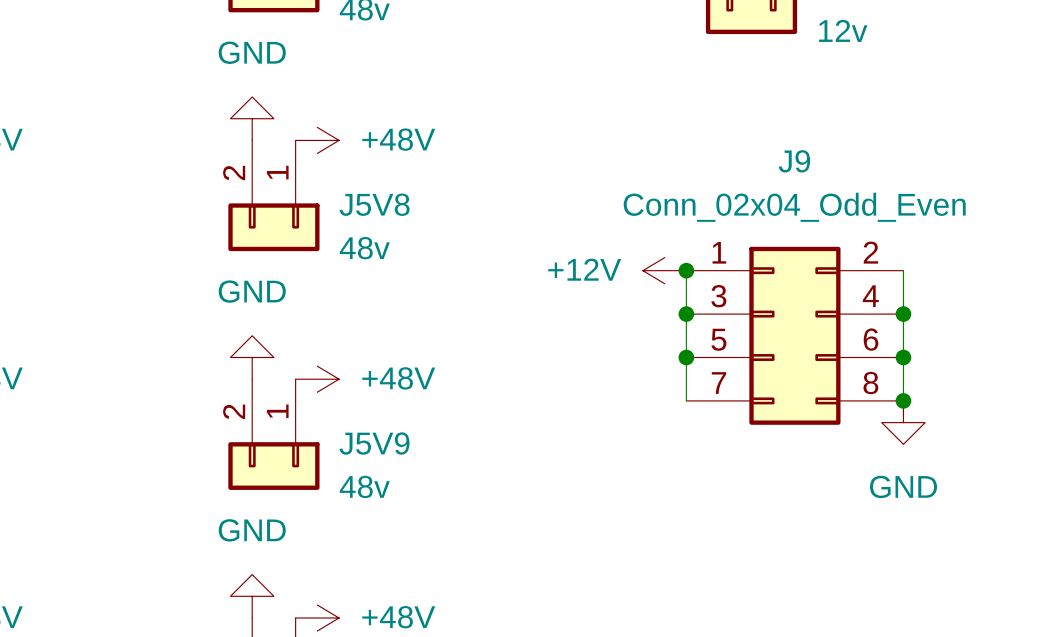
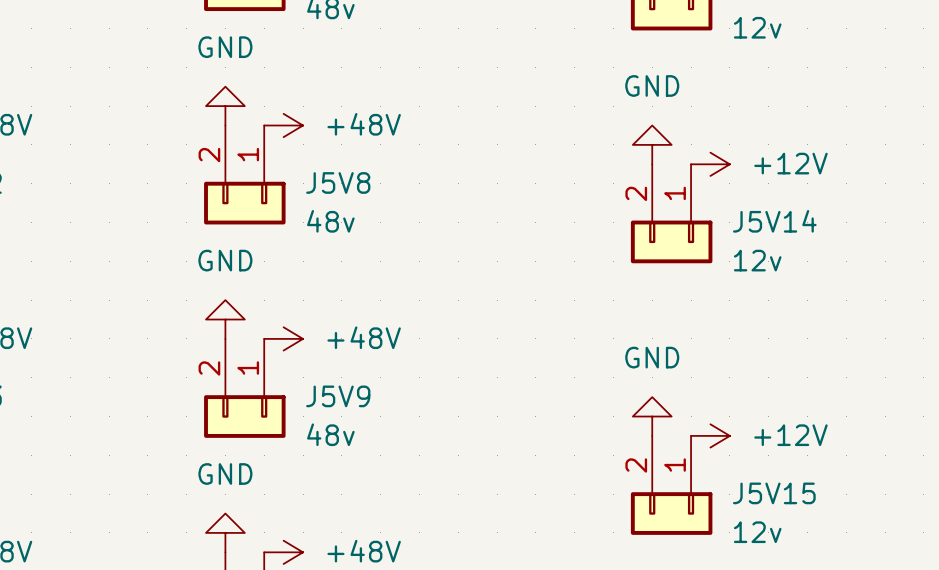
power symbol: none -> GND (652, 144)
power symbol: none -> +12V (710, 164)
J5V14: none -> 12v (671, 213)
power symbol: +12V (664, 270) -> none
wire: (686, 270) (686, 400) -> none
junction: (686, 270) -> none
wire: (903, 270) (903, 400) -> none
junction: (686, 314) -> none
junction: (903, 314) -> none
J9: Conn_02x04_Odd_Even (794, 335) -> none
junction: (686, 357) -> none
junction: (903, 357) -> none
junction: (903, 400) -> none
power symbol: GND (903, 422) -> none
power symbol: none -> GND (652, 416)
power symbol: none -> +12V (710, 435)
J5V15: none -> 12v (671, 485)

